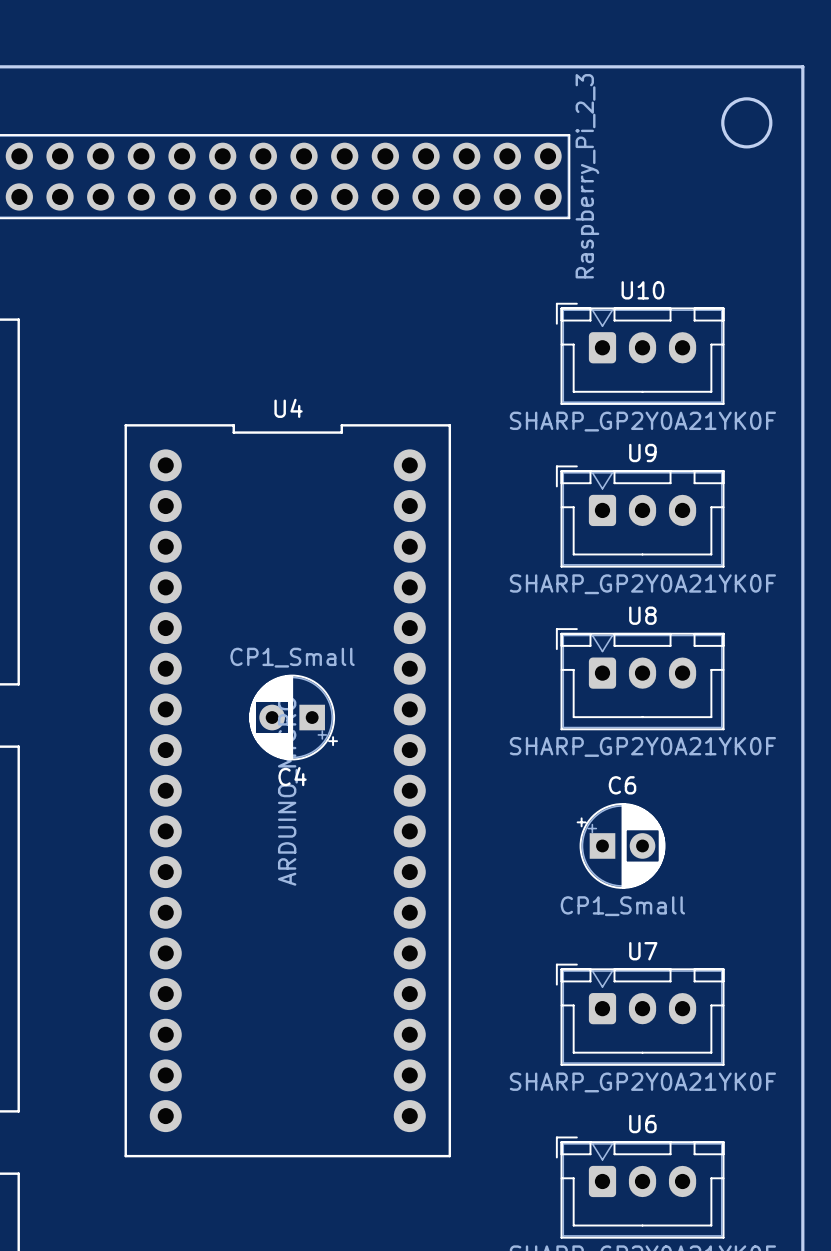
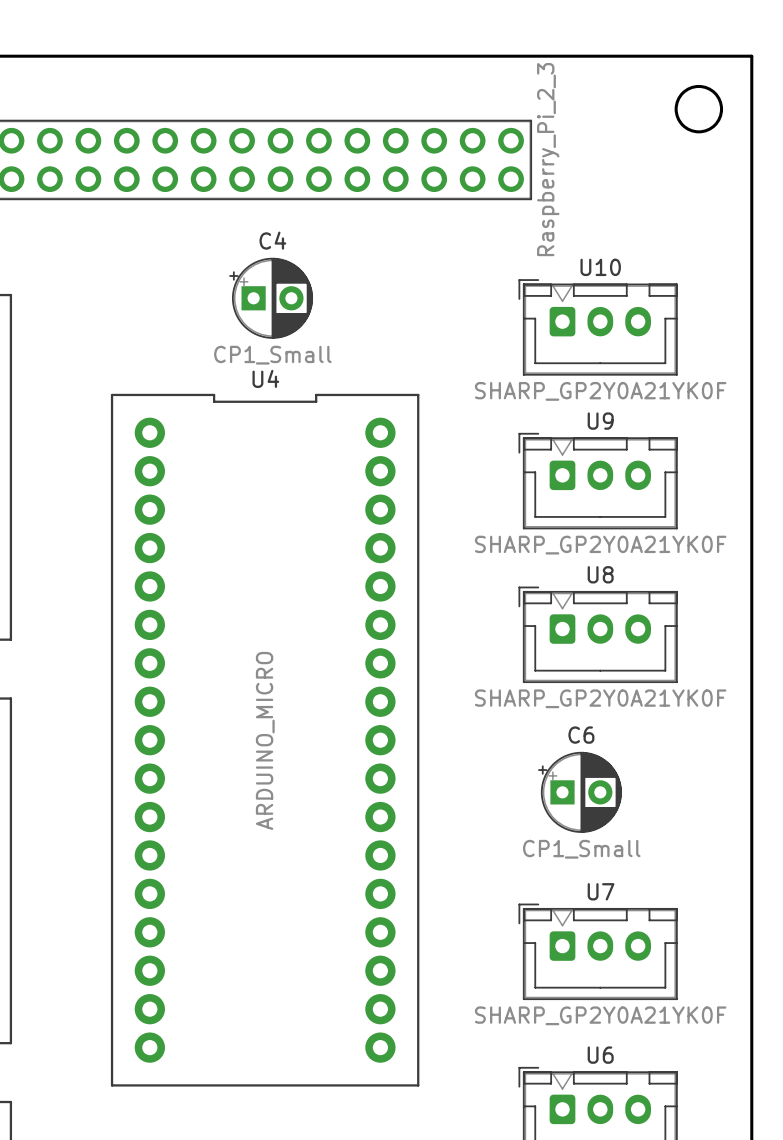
C4 rotation: 0° (293, 717) -> 180° (271, 298)
C4 position: (293, 717) -> (271, 298)

